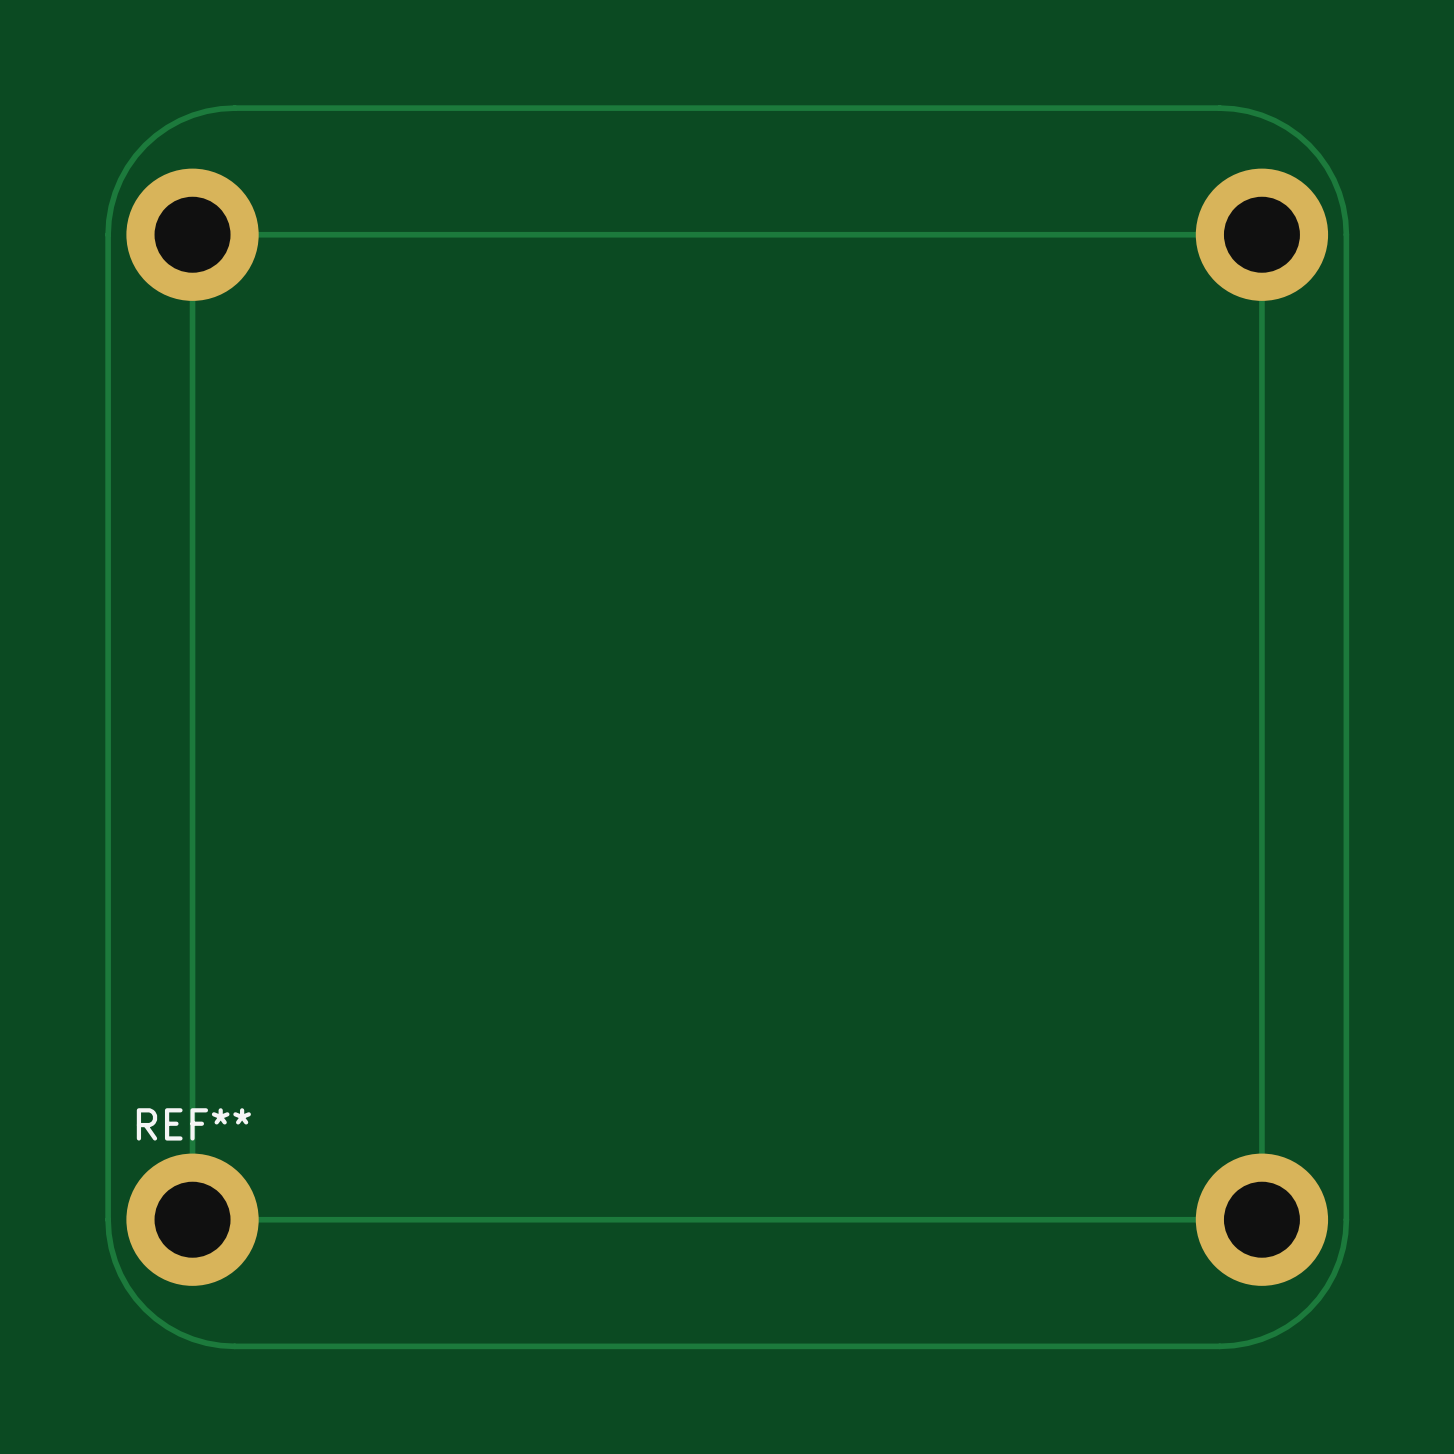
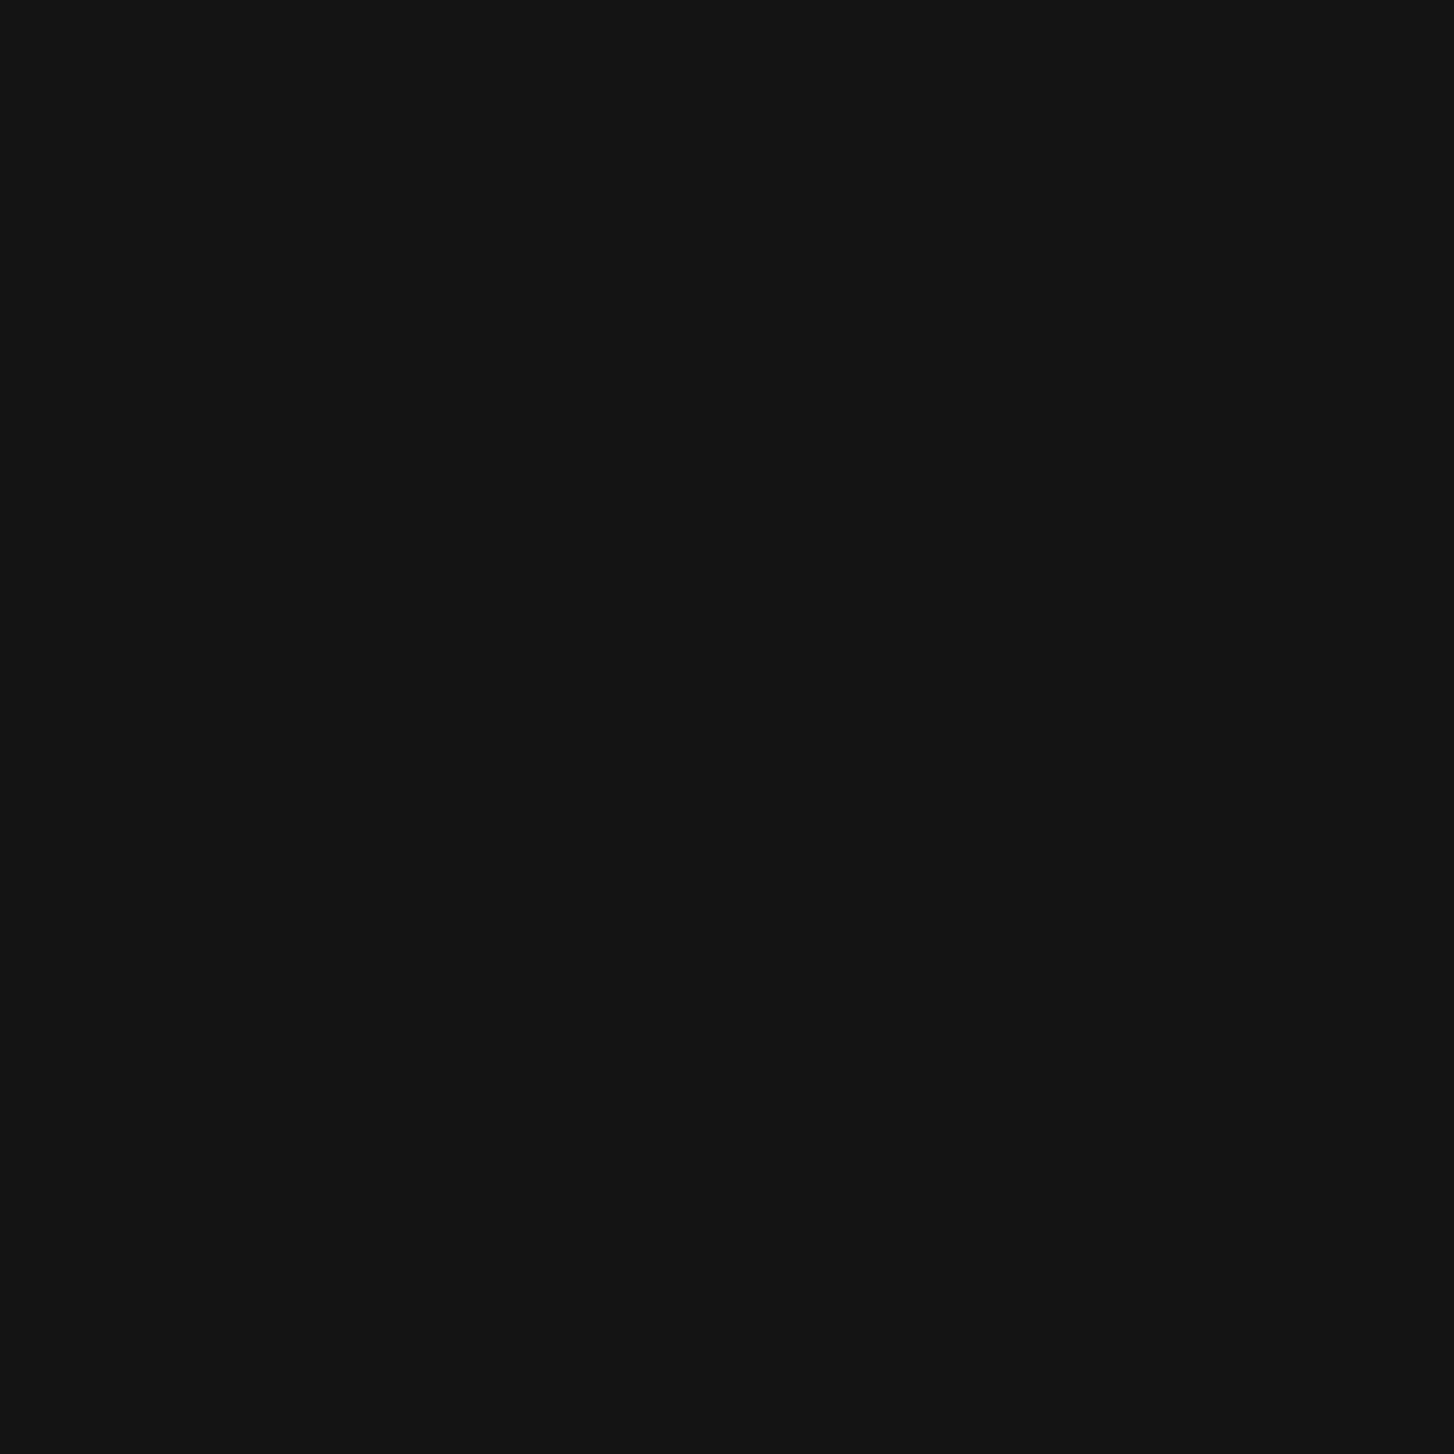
track: (234, 108) (1219, 108) (1247, 111) (1274, 120) (1298, 135) (1318, 155) (1326, 167) (1339, 192) (1345, 220) (1346, 234) (1346, 1219) (1343, 1247) (1333, 1274) (1318, 1298) (1298, 1318) (1287, 1326) (1261, 1339) (1247, 1343) (1219, 1346) (234, 1346) (206, 1343) (179, 1333) (155, 1318) (135, 1298) (127, 1287) (115, 1261) (108, 1233) (108, 1219) (108, 220) (111, 206) (120, 179) (135, 155) (155, 135) (179, 120) (192, 115) (220, 108) (234, 108) -> none
track: (192, 234) (1261, 234) (1261, 1219) (192, 1219) (192, 234) -> none
part: (192, 234) -> none
part: (1261, 234) -> none
REF**: (192, 1219) -> none
part: (1261, 1219) -> none

